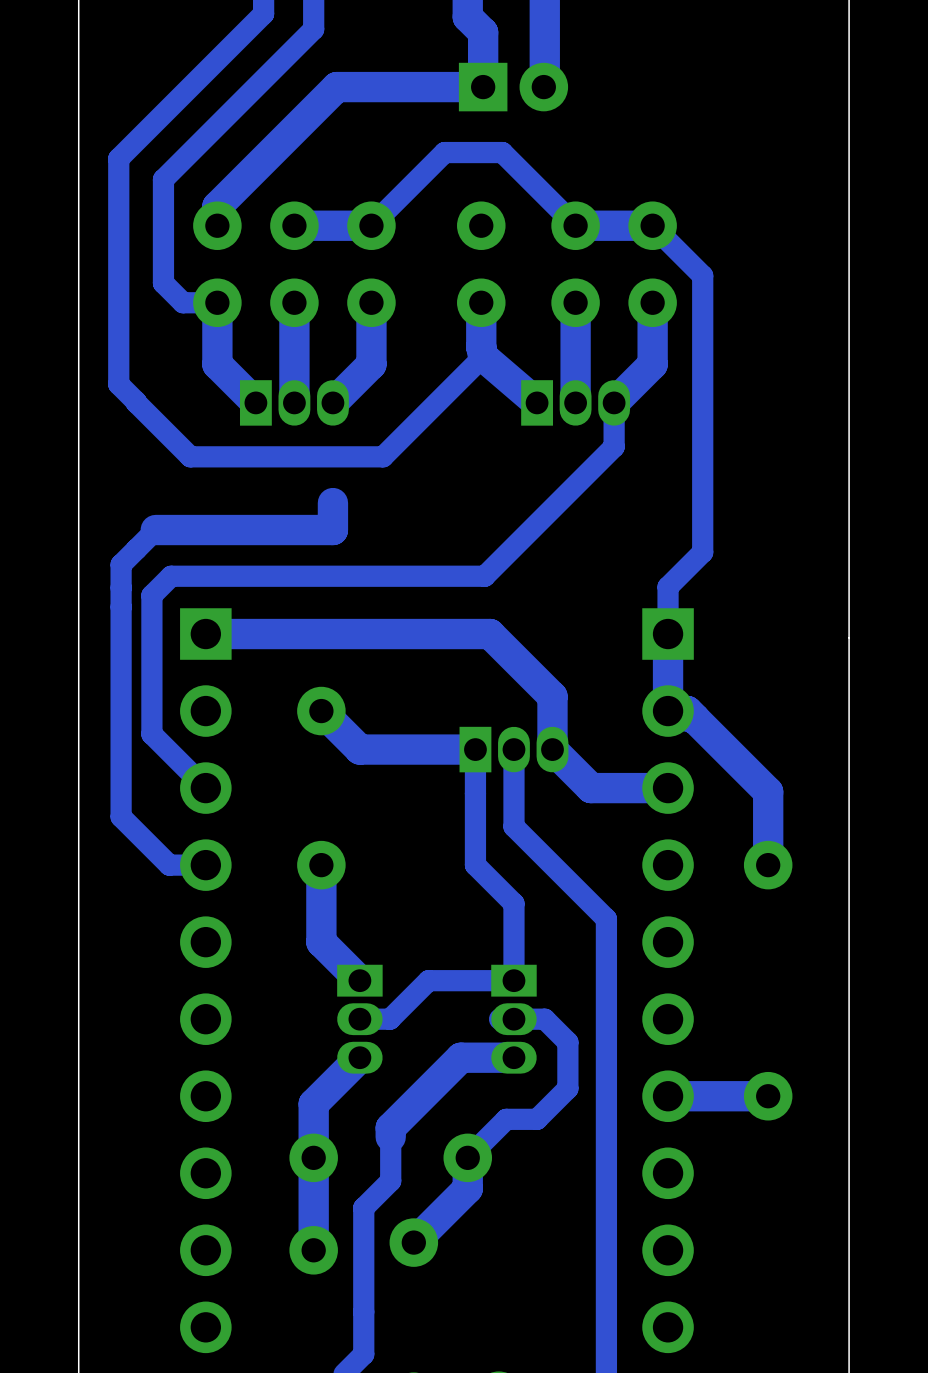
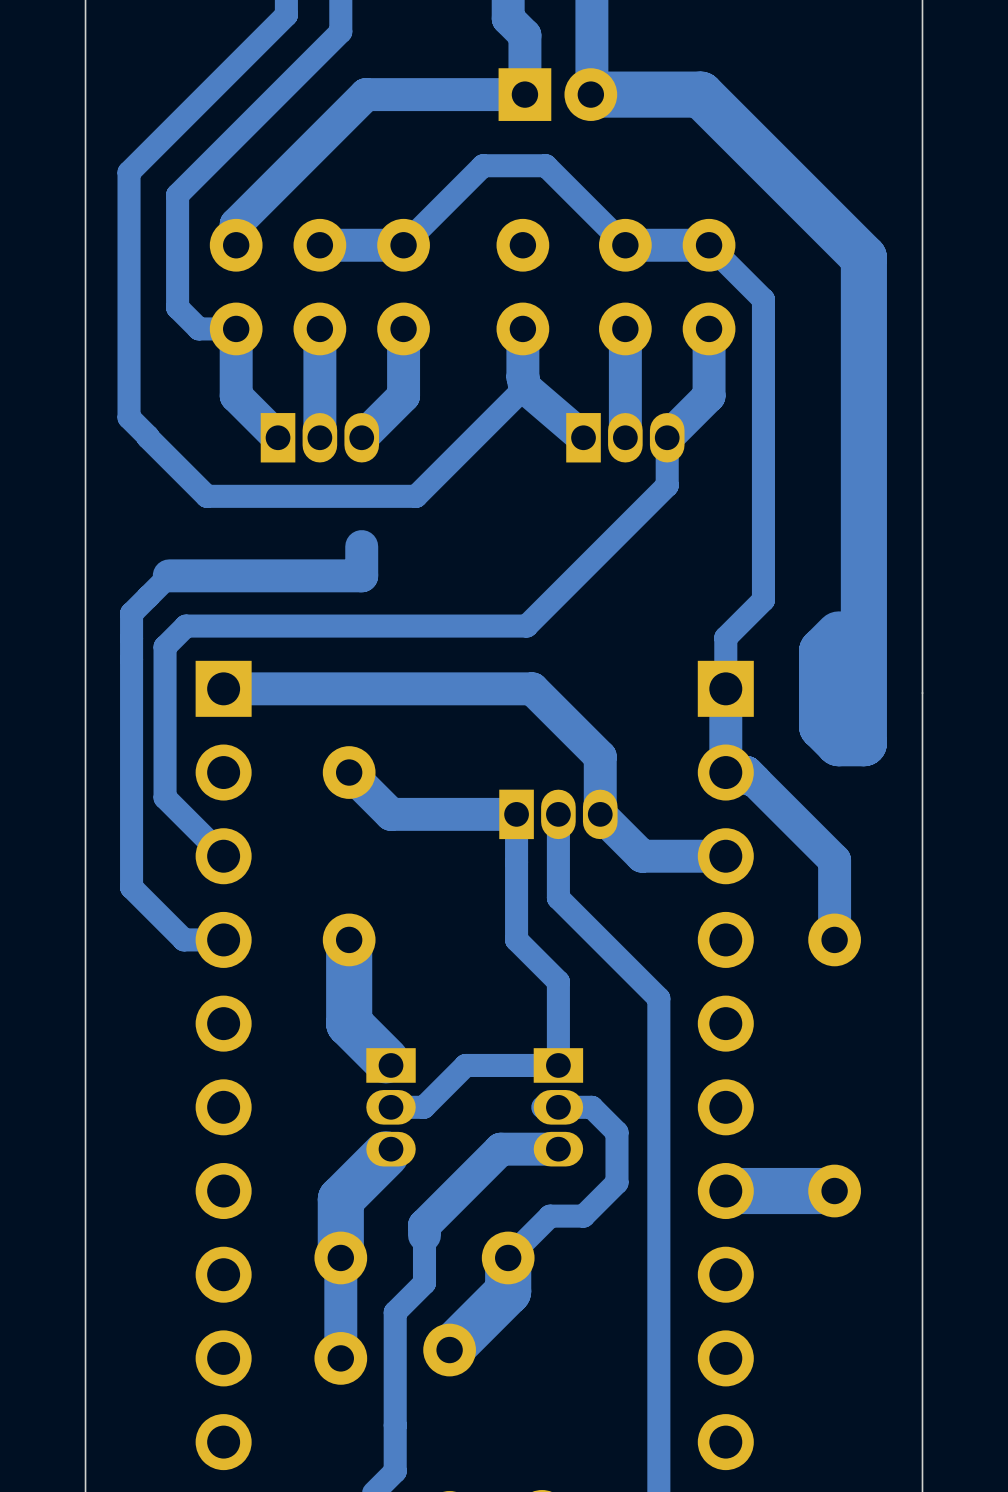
track: none -> (590, 94) (700, 94) (863, 257) (863, 743) (838, 743) (822, 726) (822, 651) (838, 634)
track width: thin (321, 865) (321, 942) (355, 975) -> thick (349, 939) (349, 1023) (385, 1060)
track width: thin (355, 1062) (313, 1103) (313, 1157) -> thick (385, 1154) (340, 1199) (340, 1257)
track width: thin (768, 1096) (668, 1096) -> thick (834, 1191) (725, 1191)
track width: thin (467, 1157) (467, 1188) (413, 1242) -> thick (508, 1257) (508, 1291) (449, 1350)

